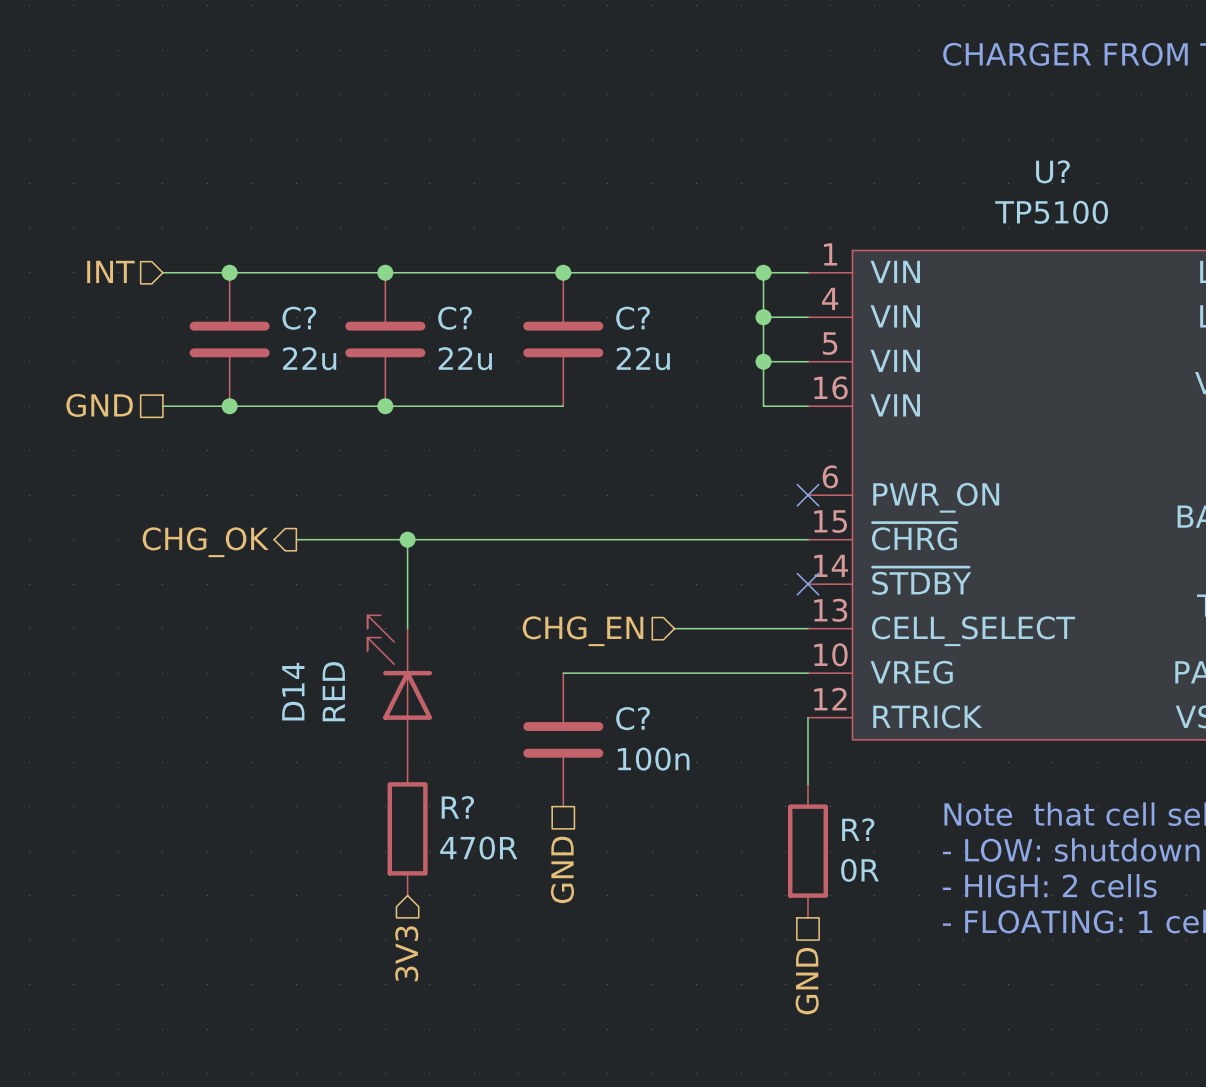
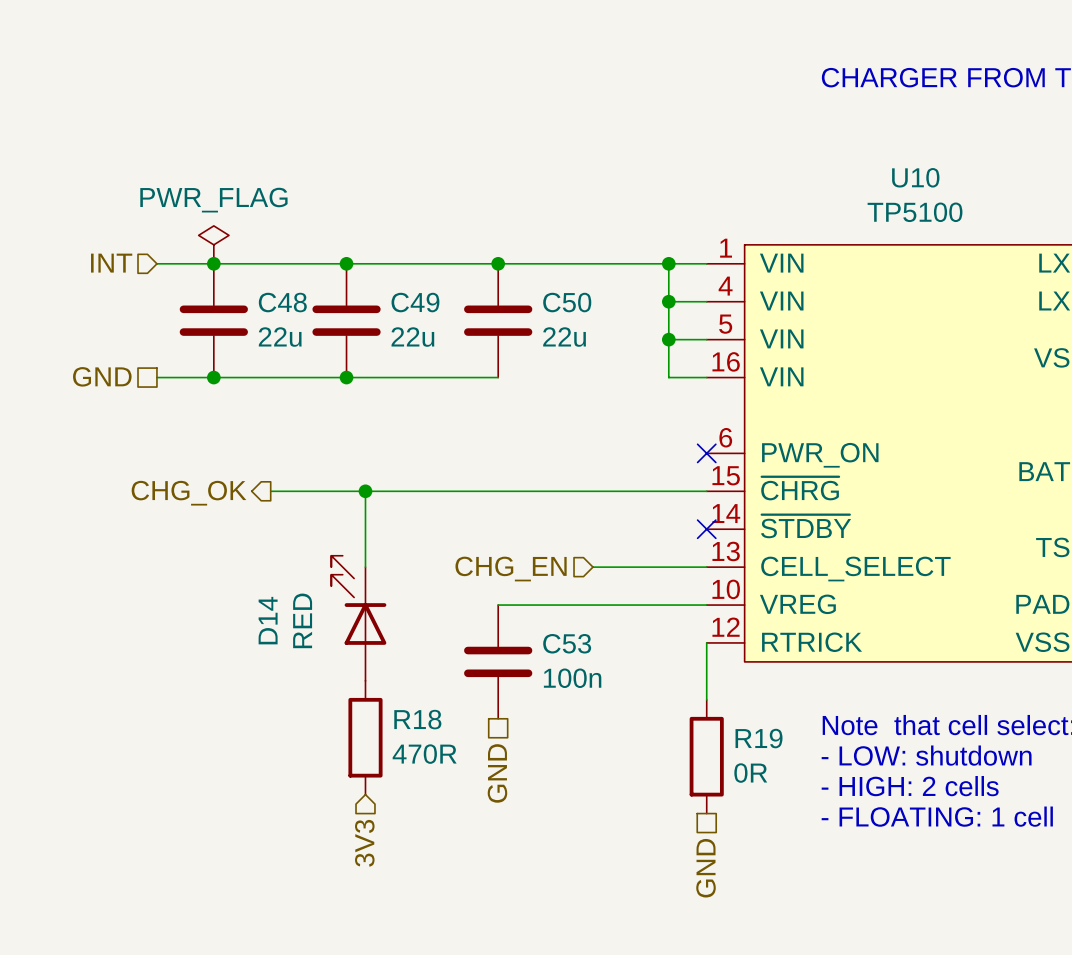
U? name: U? (1052, 171) -> U10 (915, 177)
power symbol: none -> PWR_FLAG (213, 244)
C? name: C? (299, 318) -> C48 (282, 302)
C? name: C? (455, 318) -> C49 (415, 302)
C? name: C? (633, 318) -> C50 (567, 302)
C? name: C? (633, 718) -> C53 (567, 643)
R? name: R? (457, 807) -> R18 (417, 719)
R? name: R? (858, 829) -> R19 (759, 738)

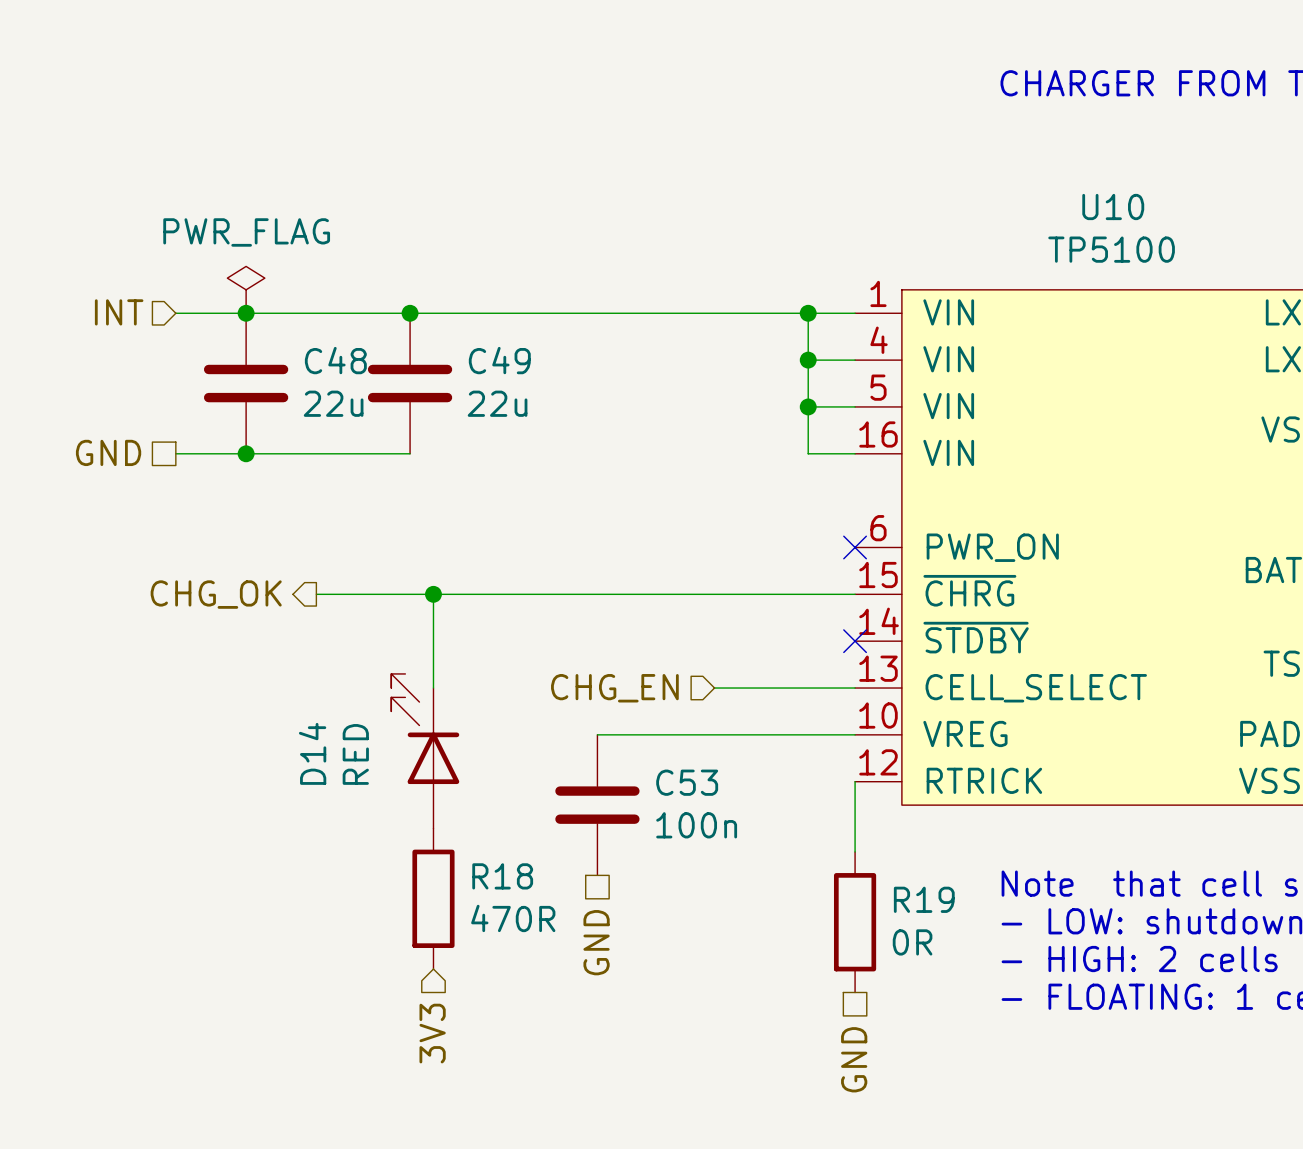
junction: (498, 263) -> none
C50: 22u (498, 320) -> none
wire: (346, 377) (498, 377) -> none
junction: (346, 377) -> none

